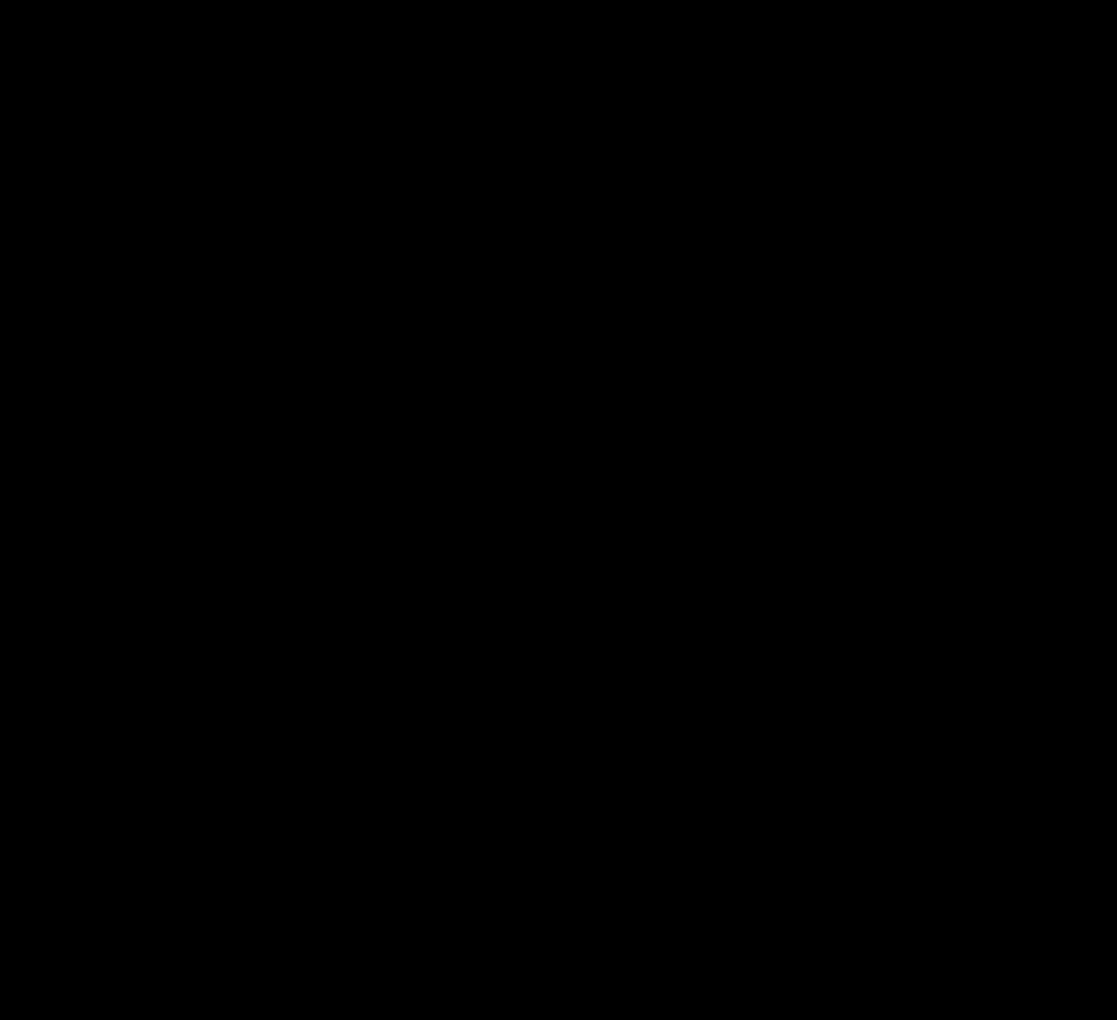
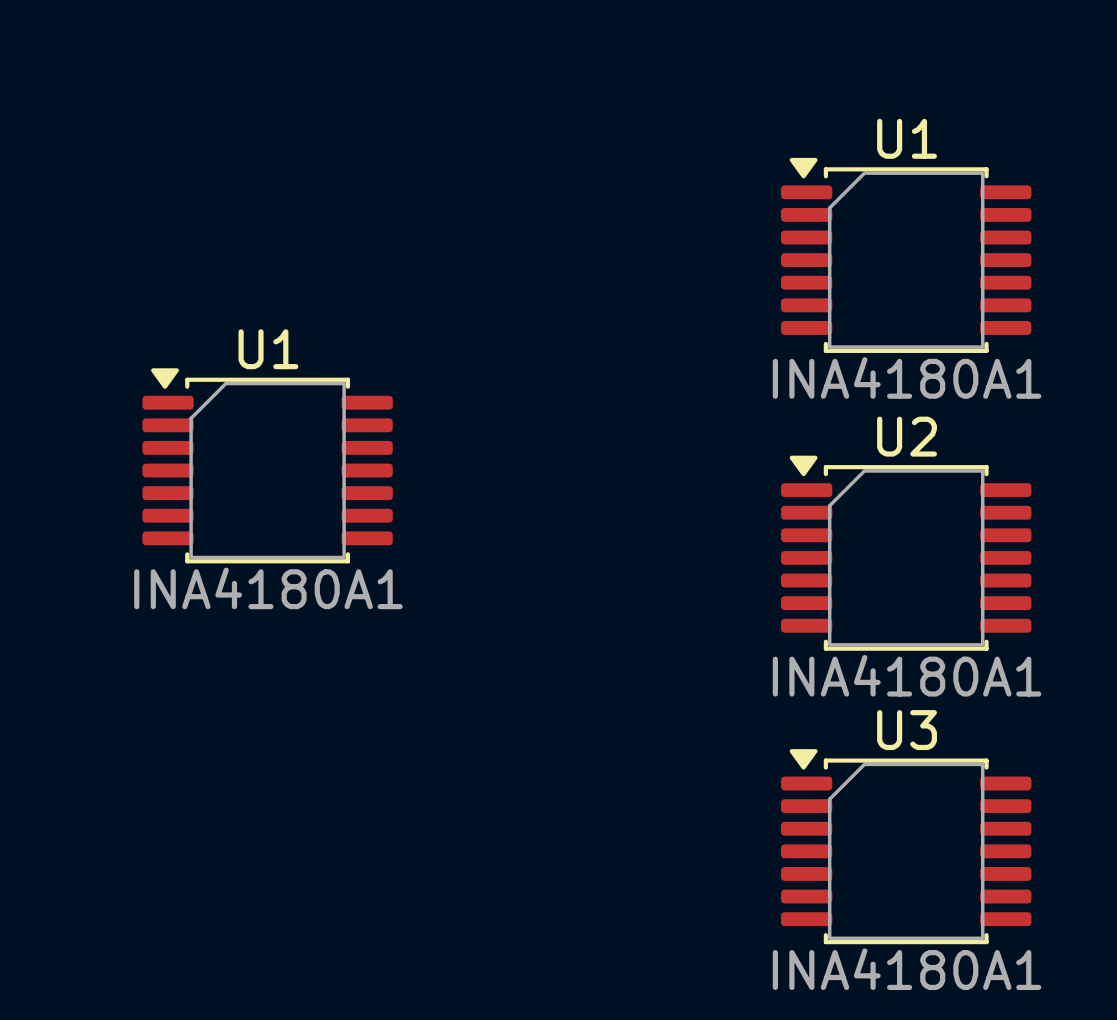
U1: none -> INA4180A1 (906, 255)
U1: none -> INA4180A1 (267, 465)
U2: none -> INA4180A1 (906, 553)
U3: none -> INA4180A1 (906, 846)

